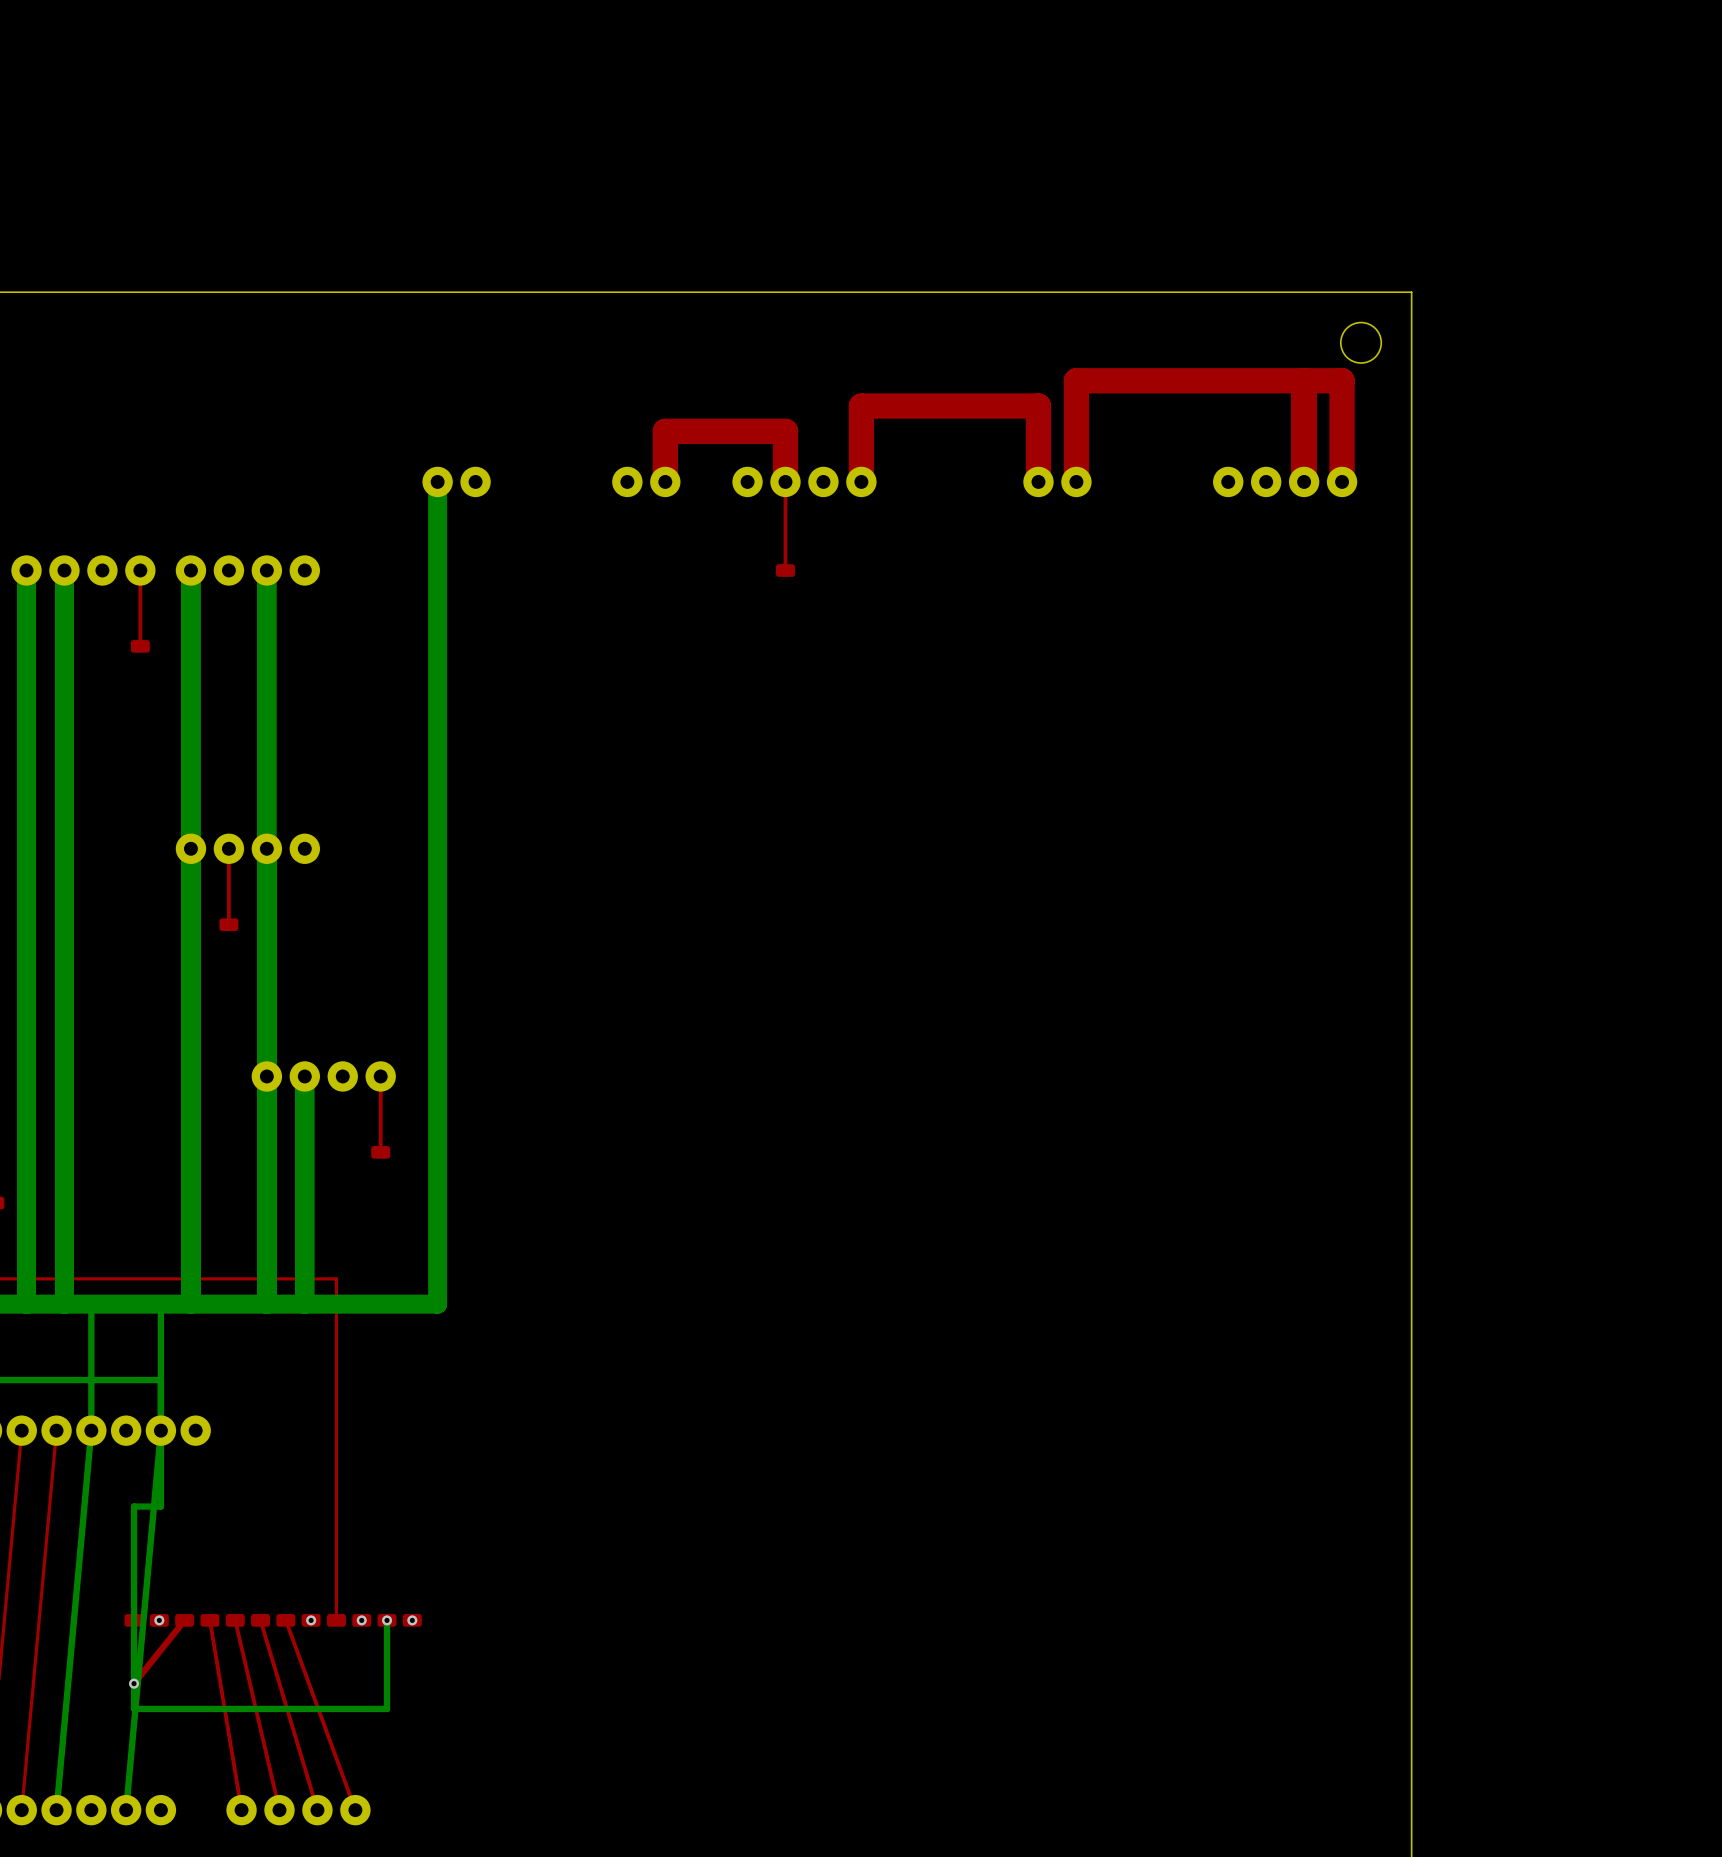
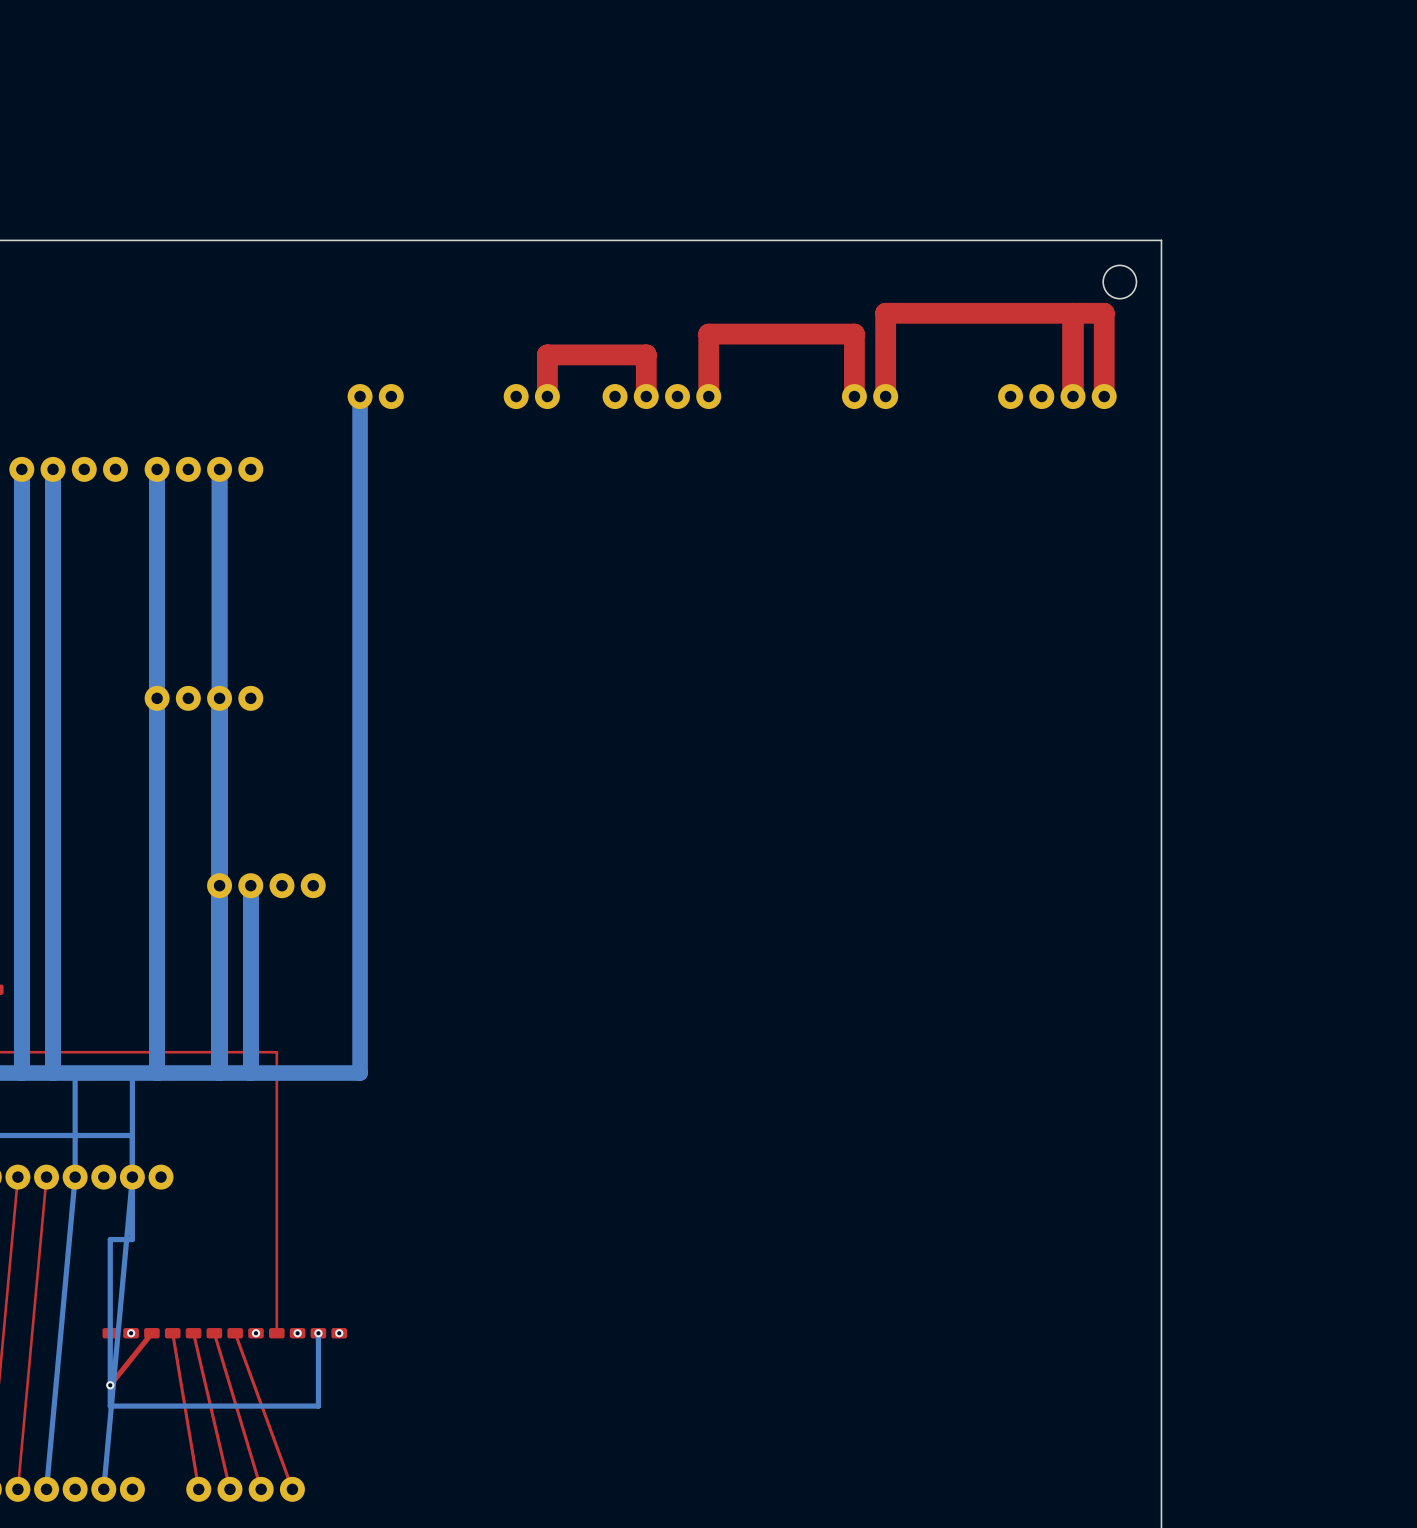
top track: (785, 481) (785, 570) -> none
top track: (140, 570) (140, 646) -> none
part: (785, 570) -> none
part: (140, 646) -> none
top track: (228, 848) (228, 924) -> none
part: (228, 924) -> none
top track: (380, 1076) (380, 1152) -> none
part: (380, 1152) -> none

